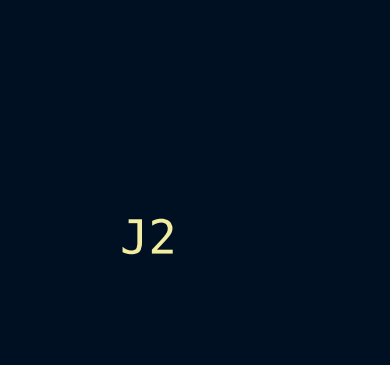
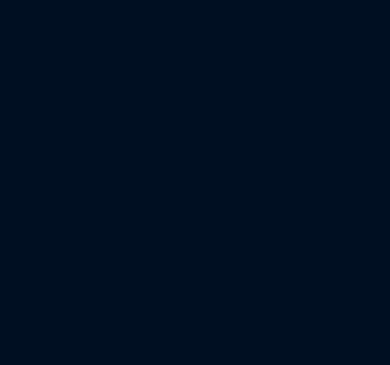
J2: (147, 236) -> none

